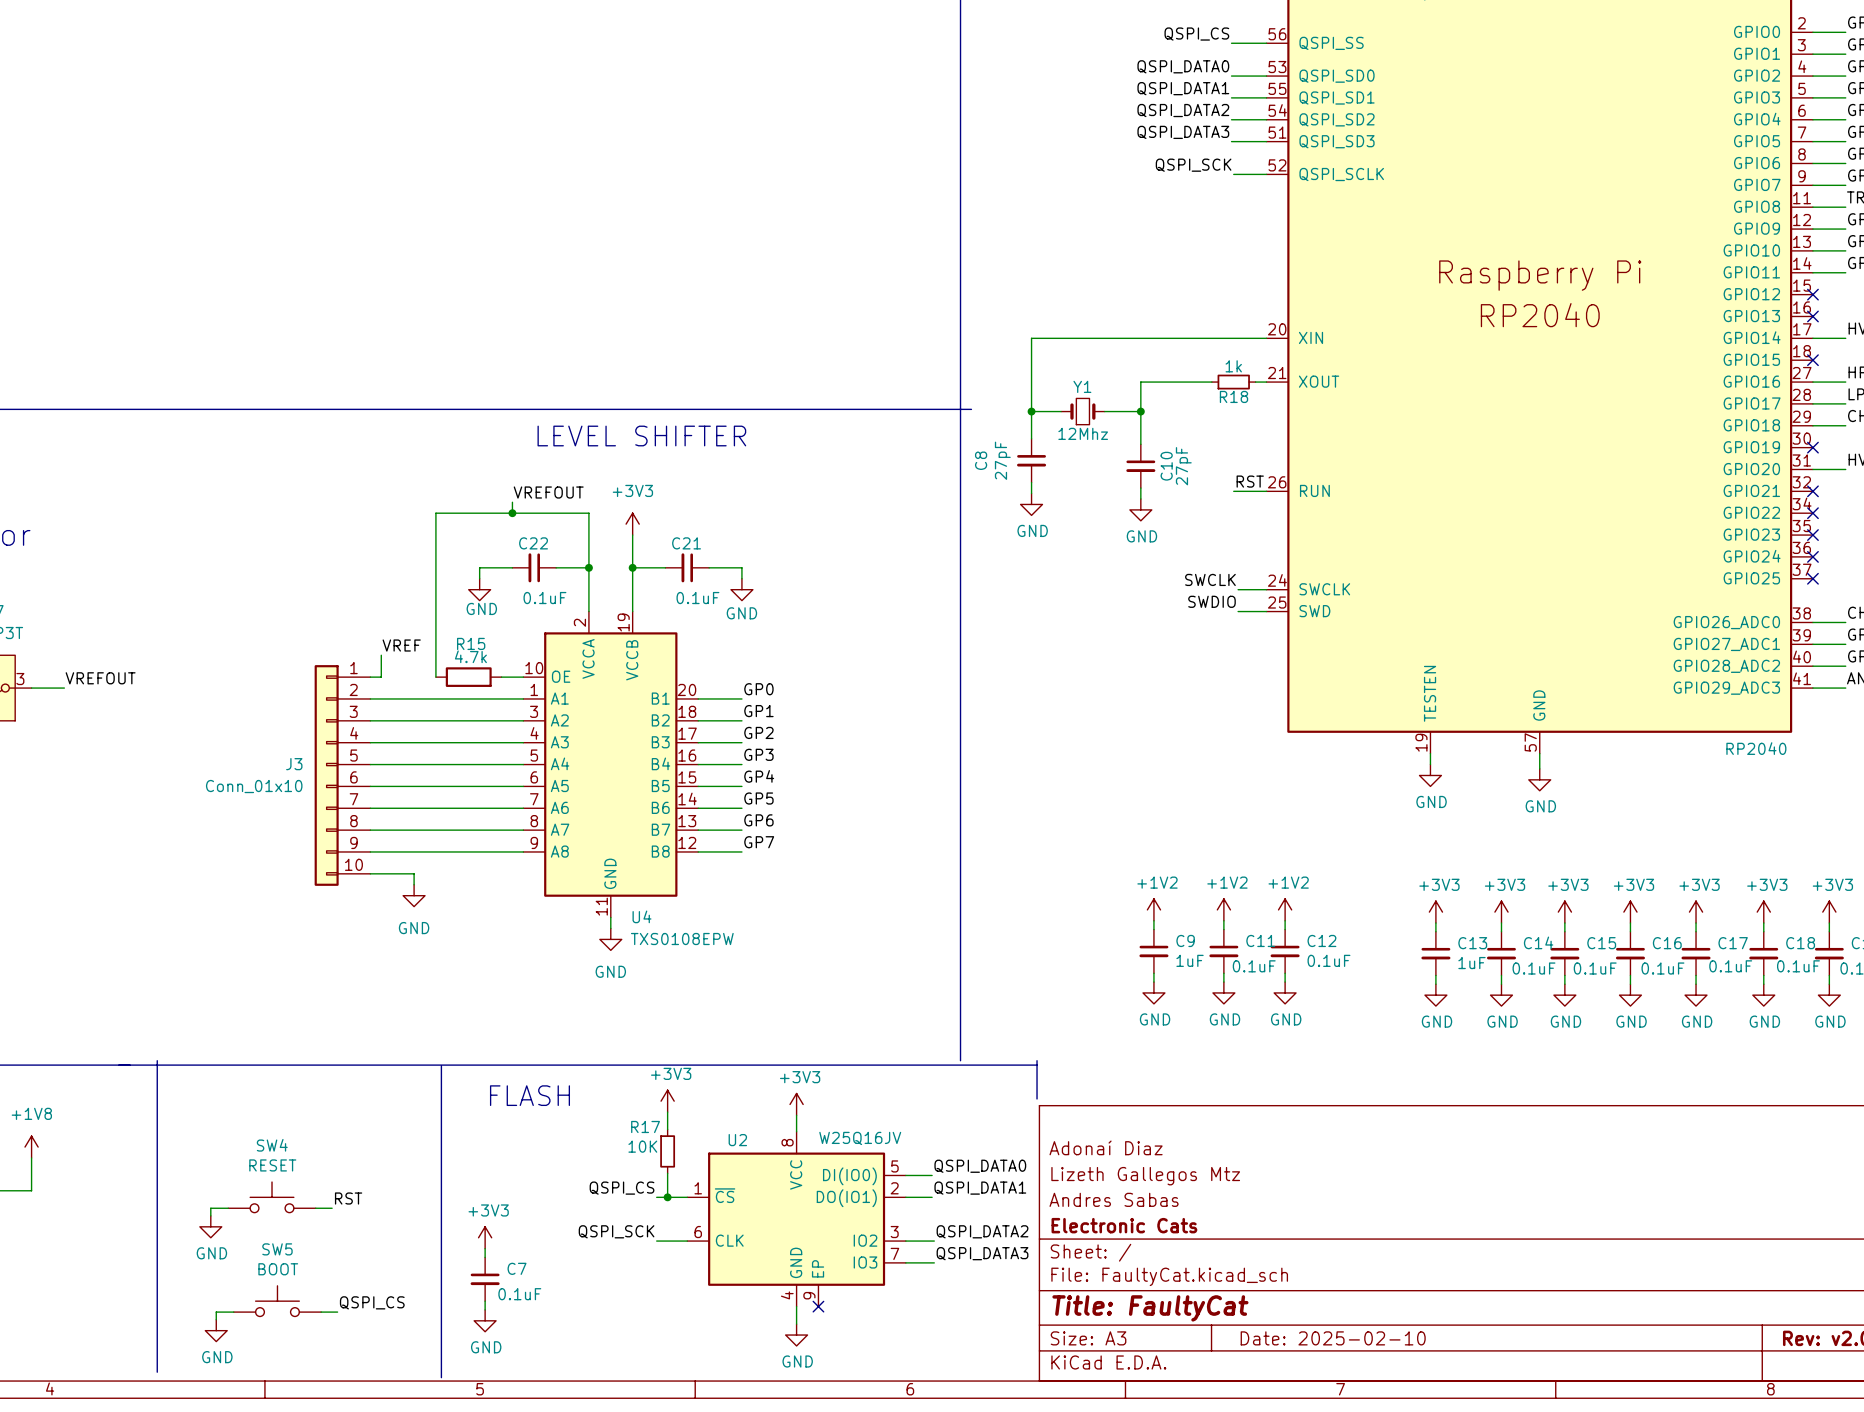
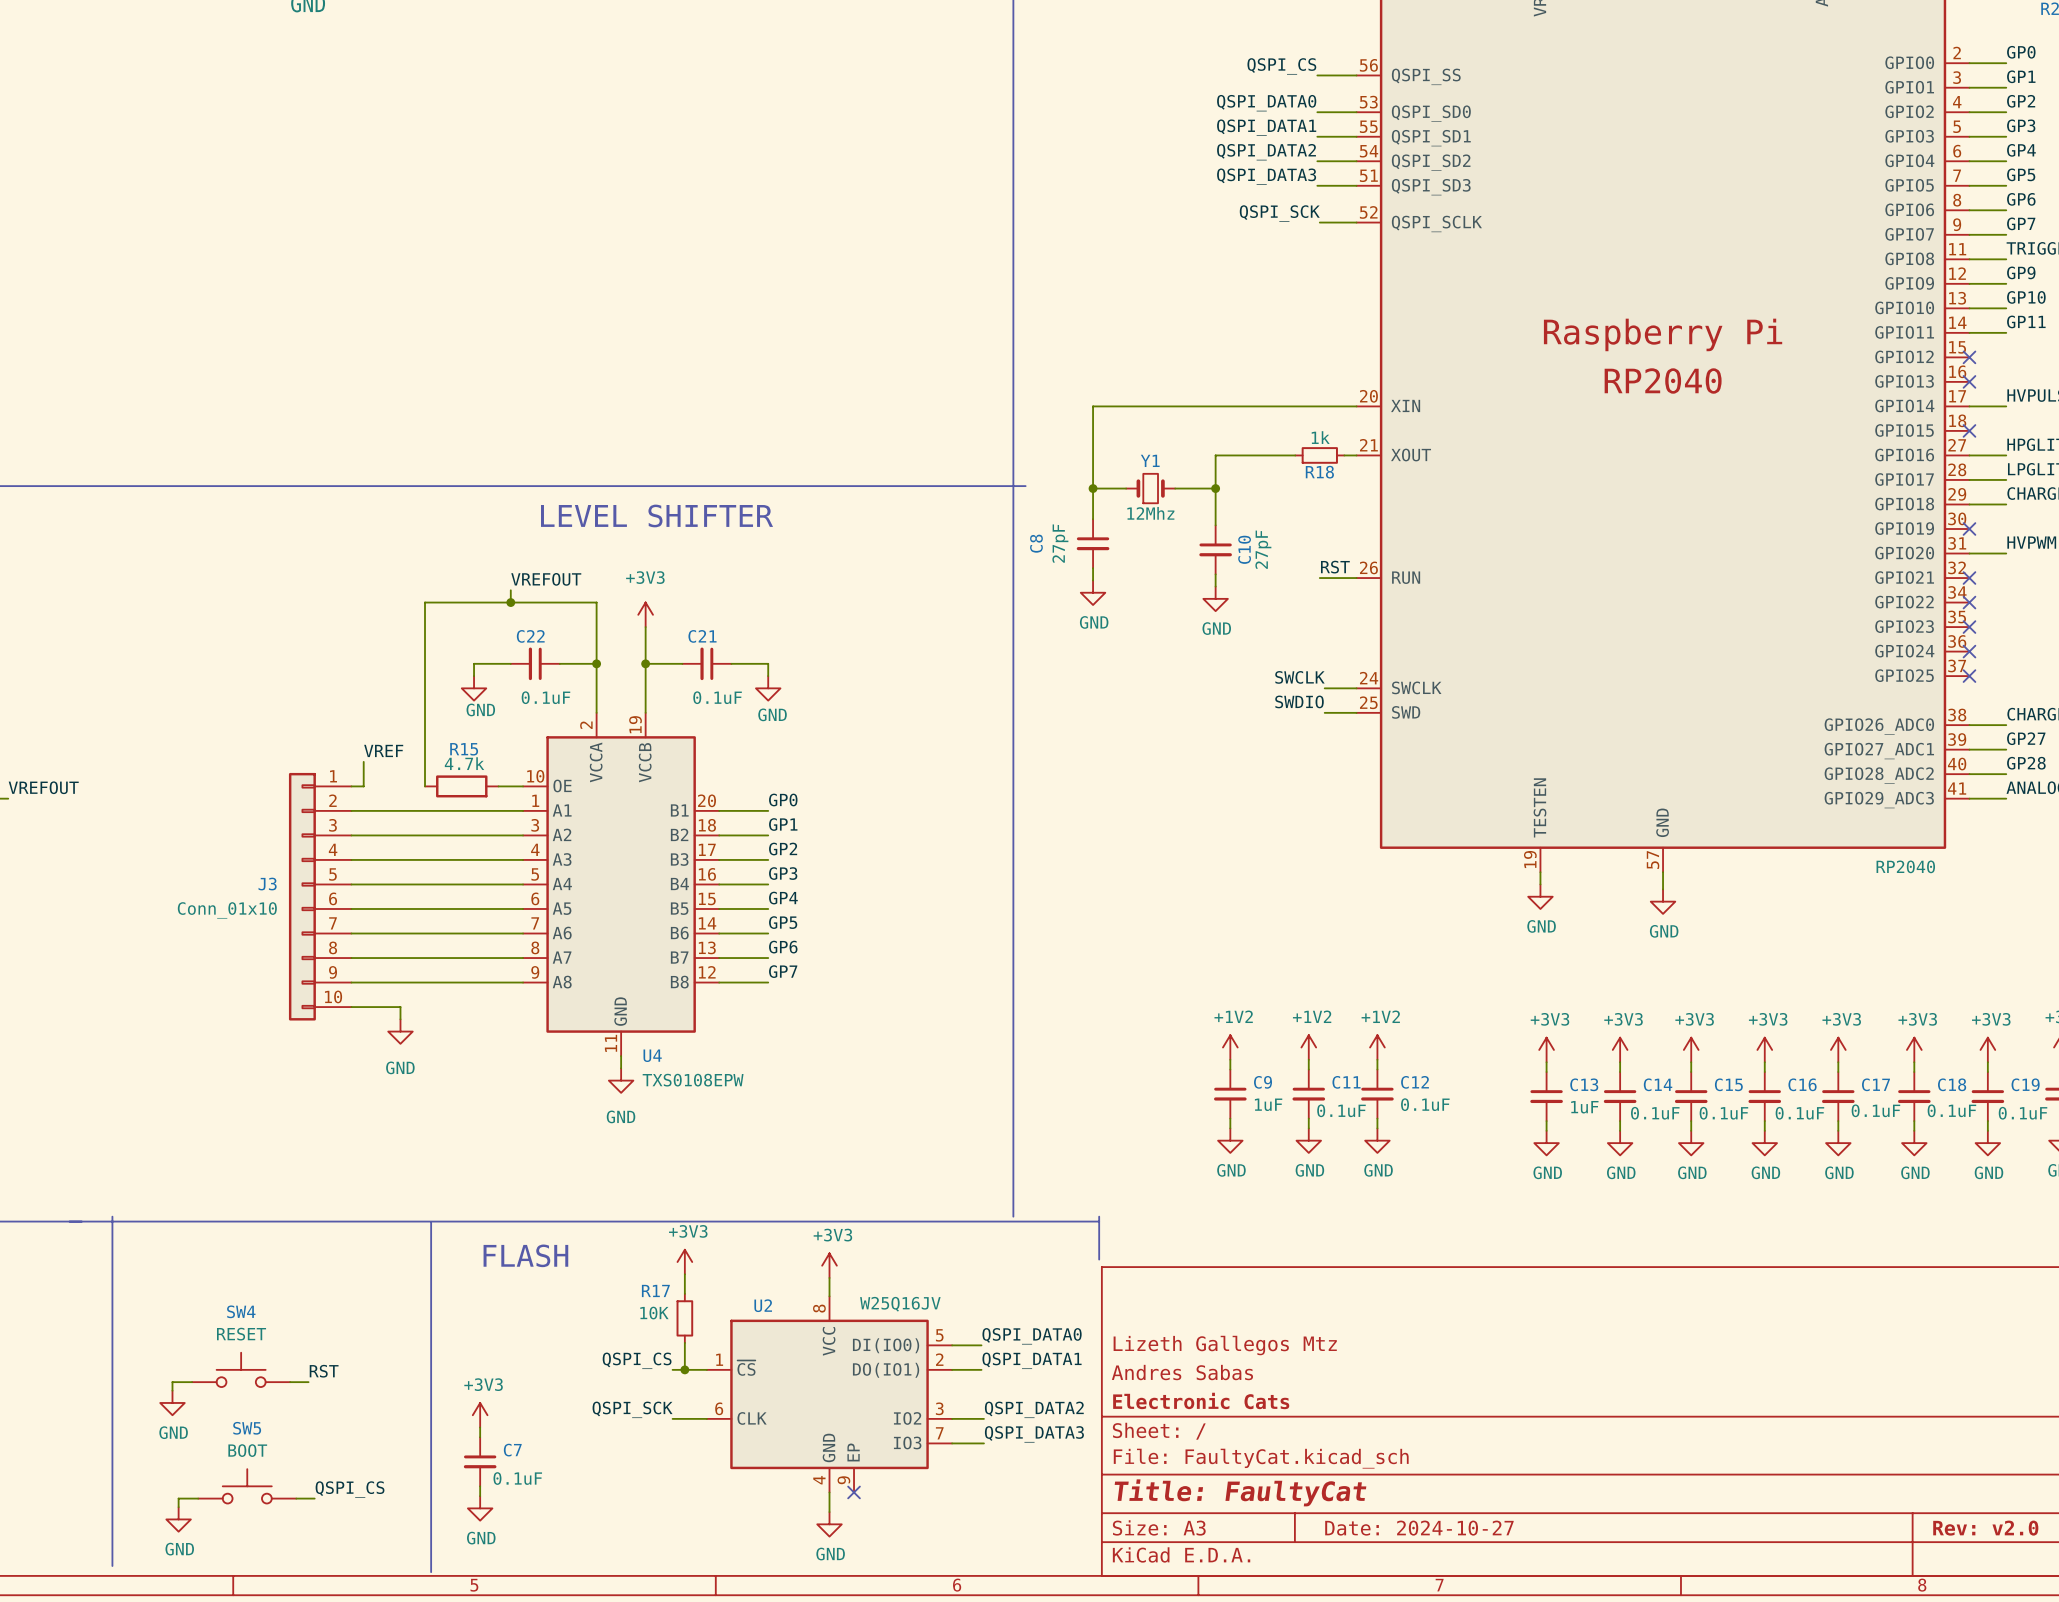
title block: Adonaí Diaz (1106, 1147) -> none
title block: Date: 2025-02-10 (1333, 1338) -> Date: 2024-10-27 (1419, 1528)

